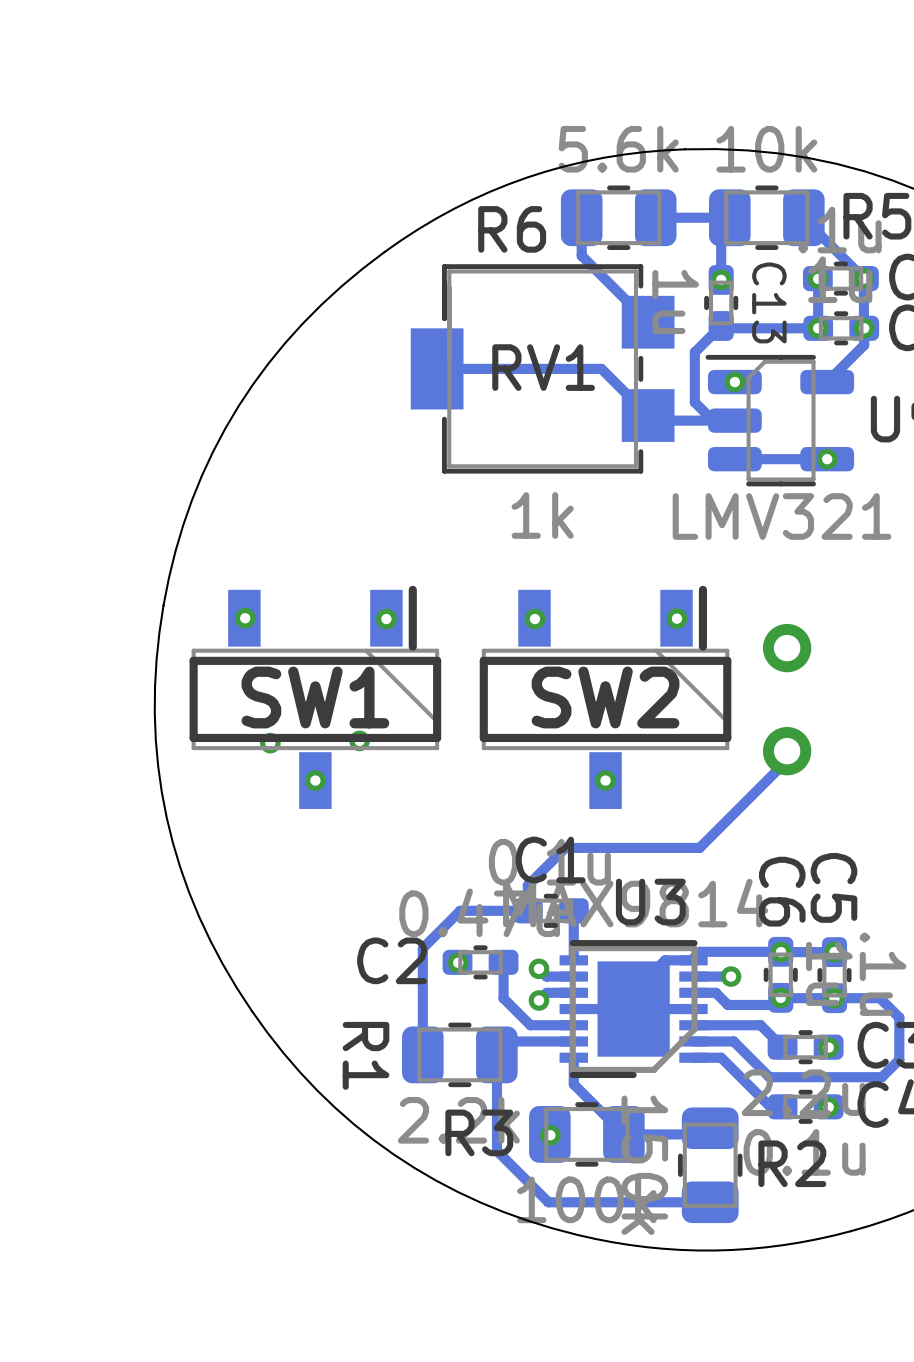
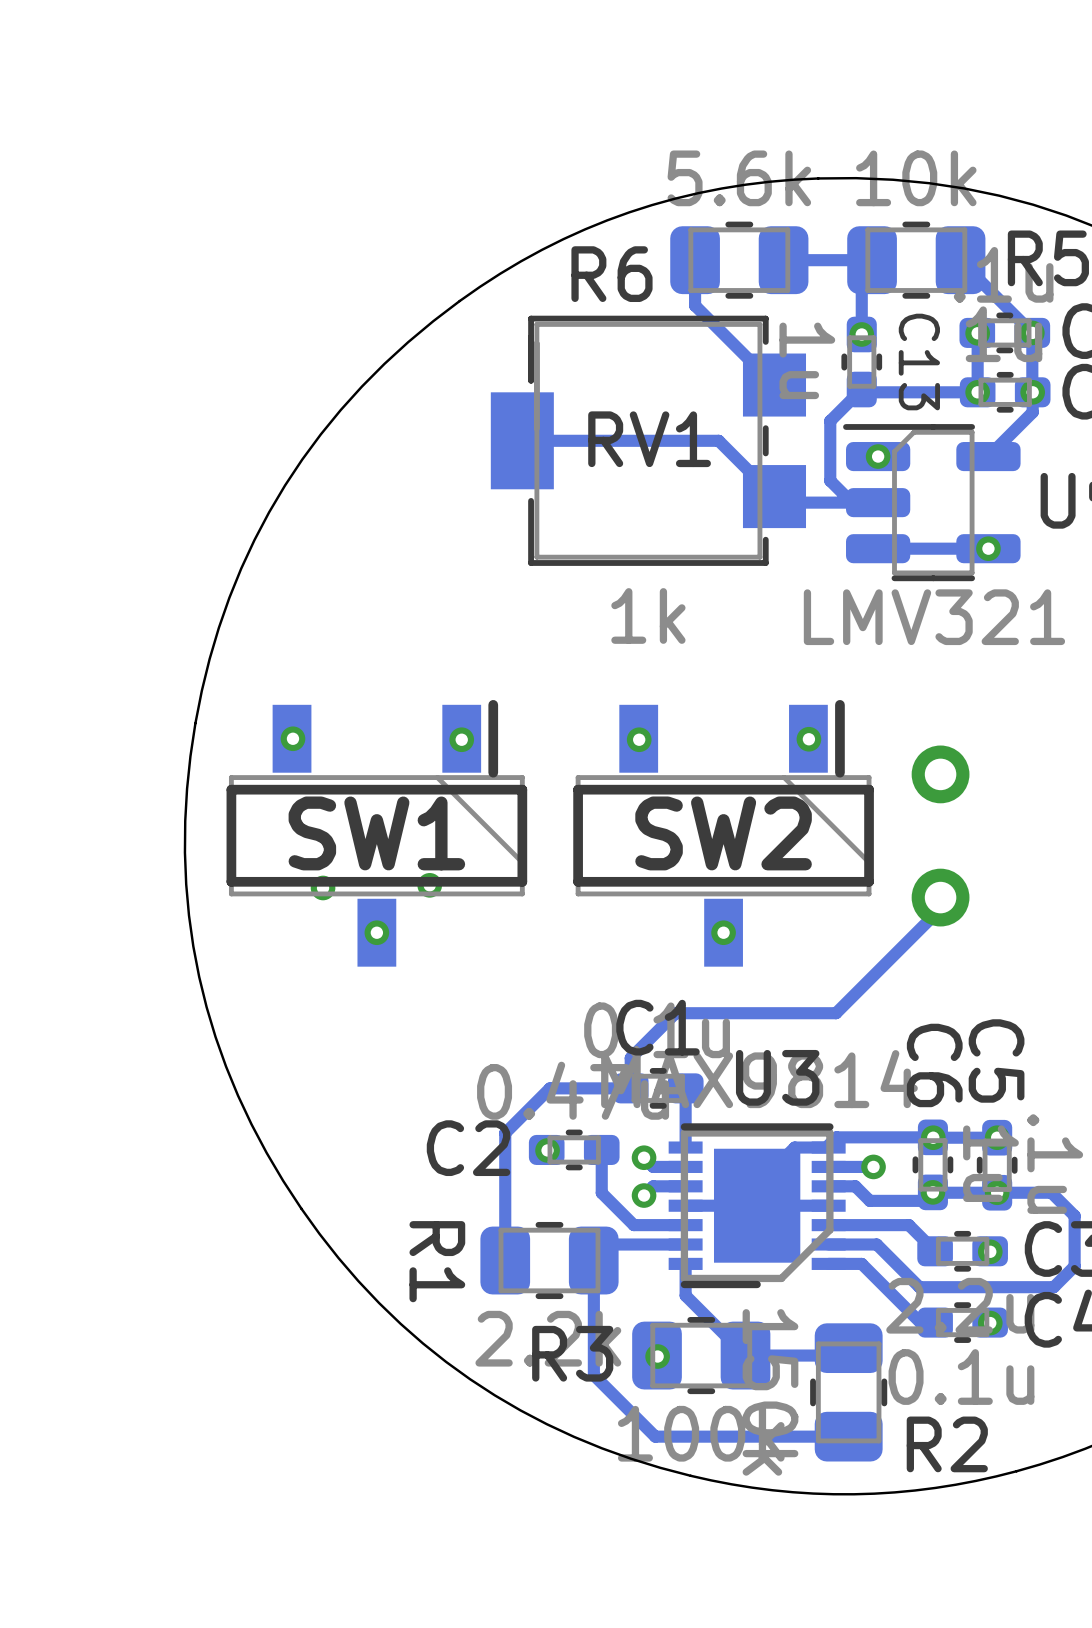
R2 name position: R2 (792, 1163) -> R2 (947, 1444)

